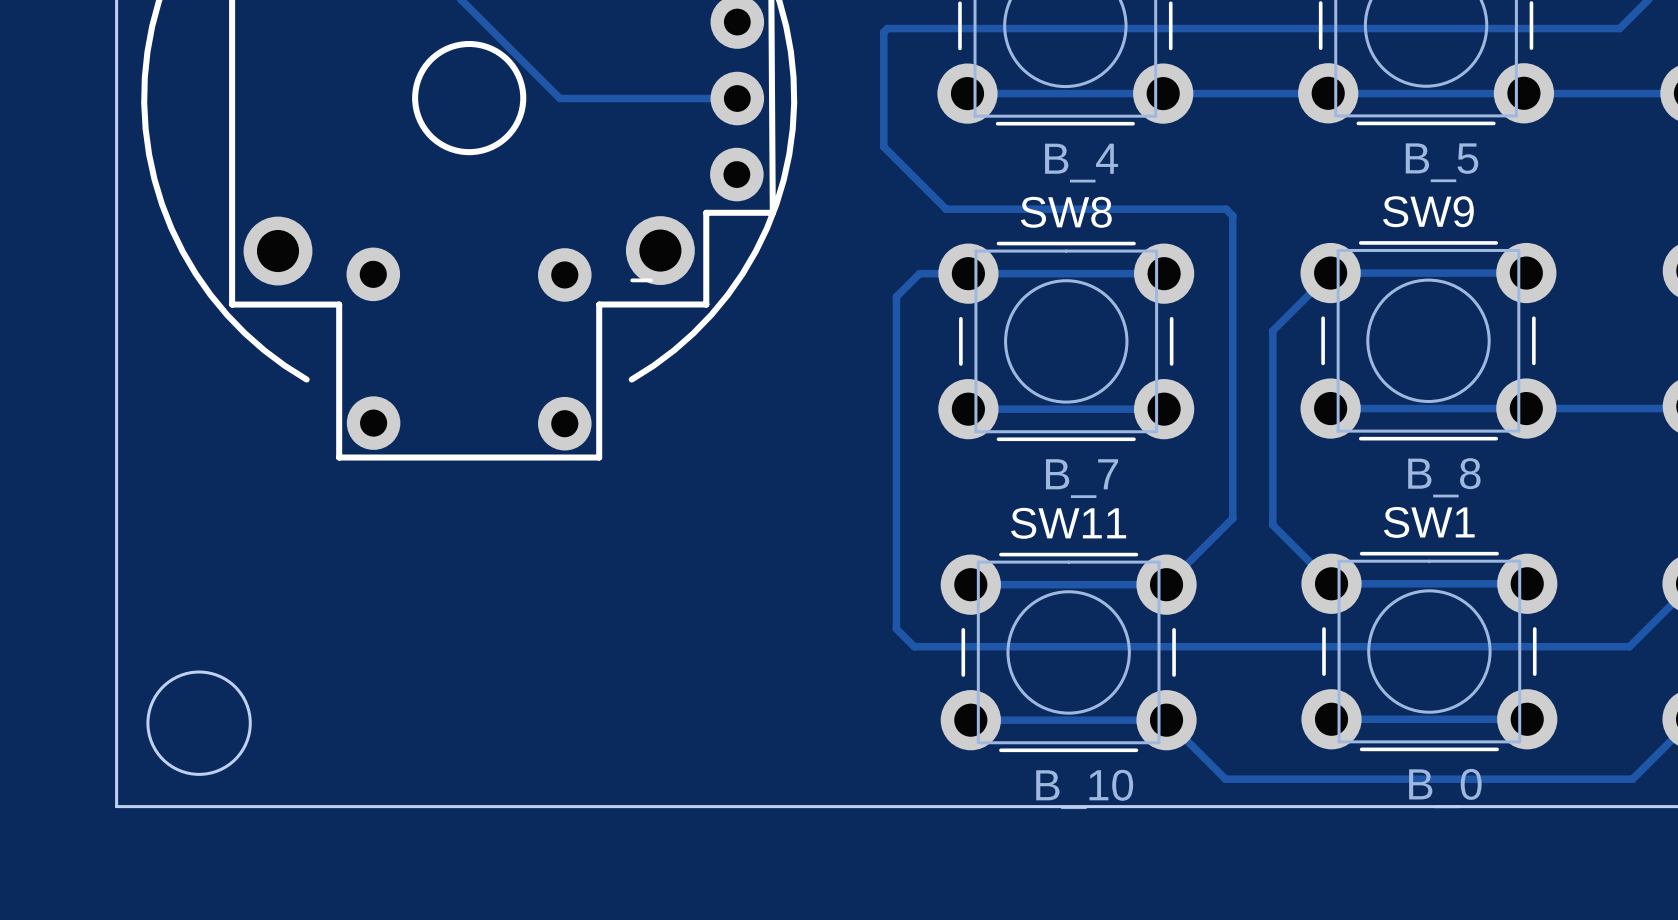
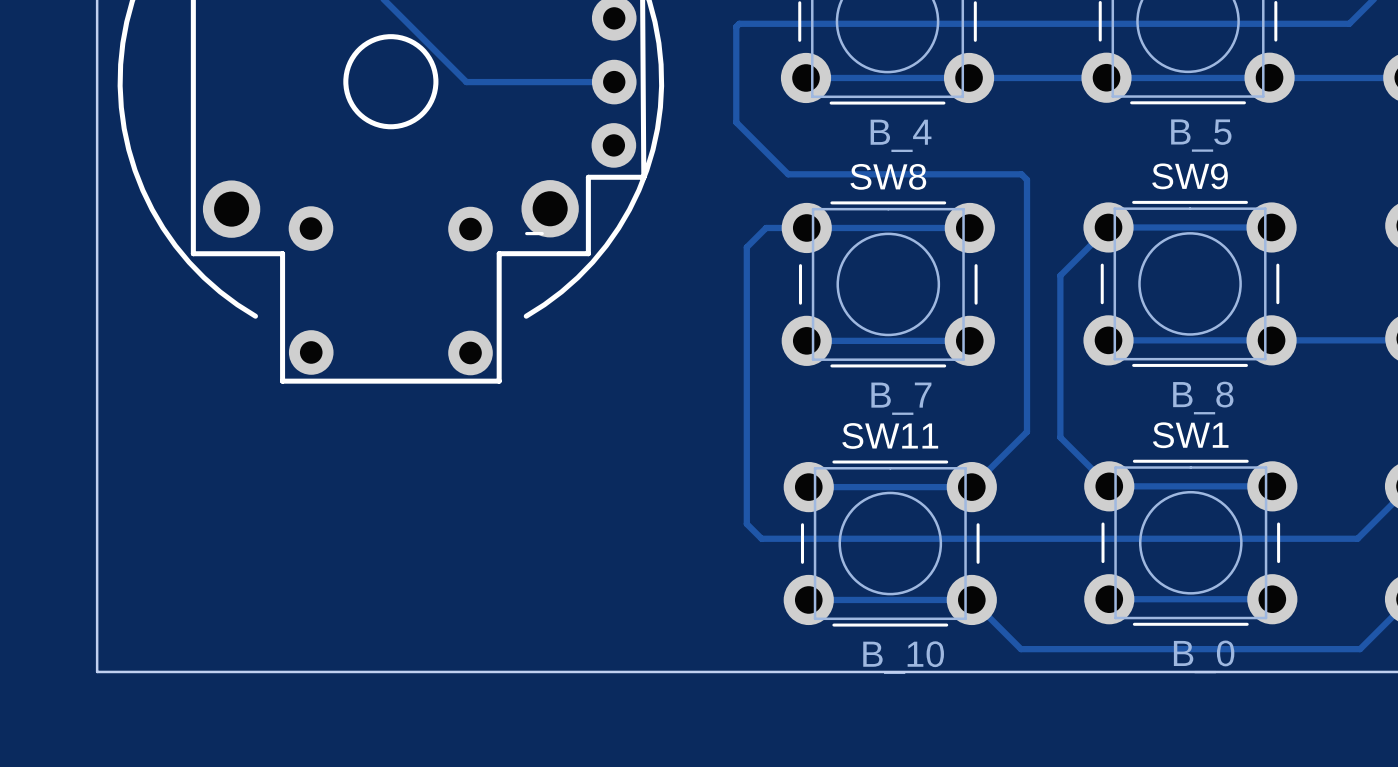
round board edge: [146, 670, 252, 776] -> none

